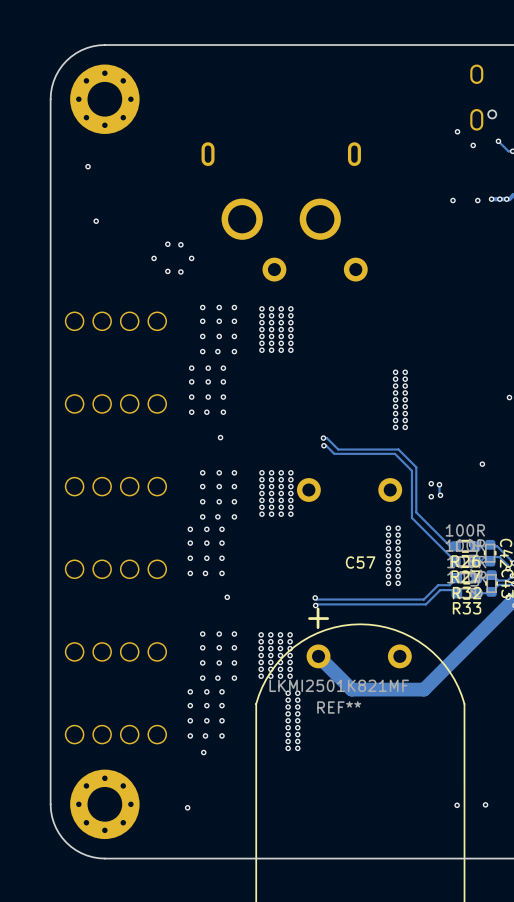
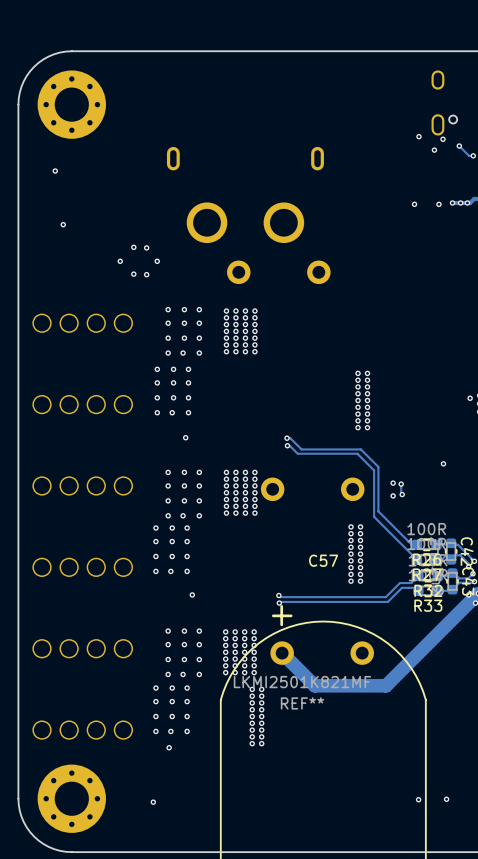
via: none -> (443, 139)

